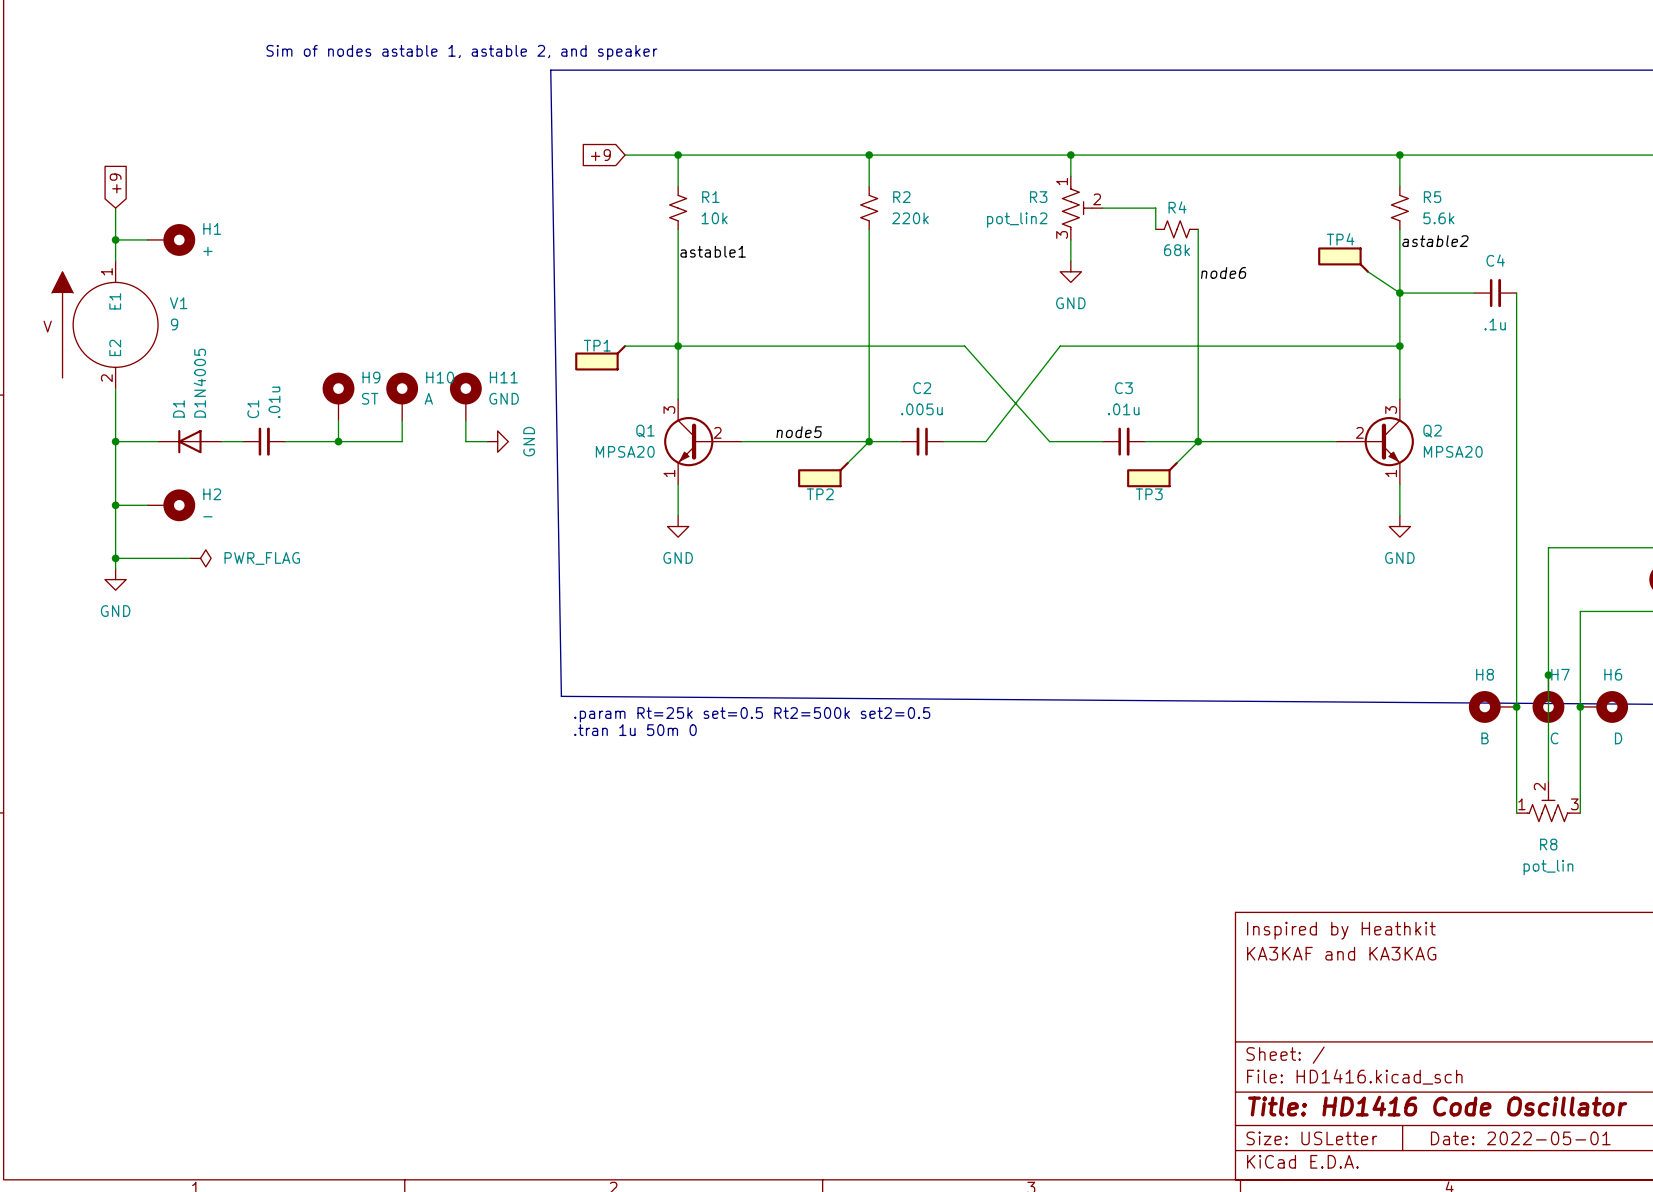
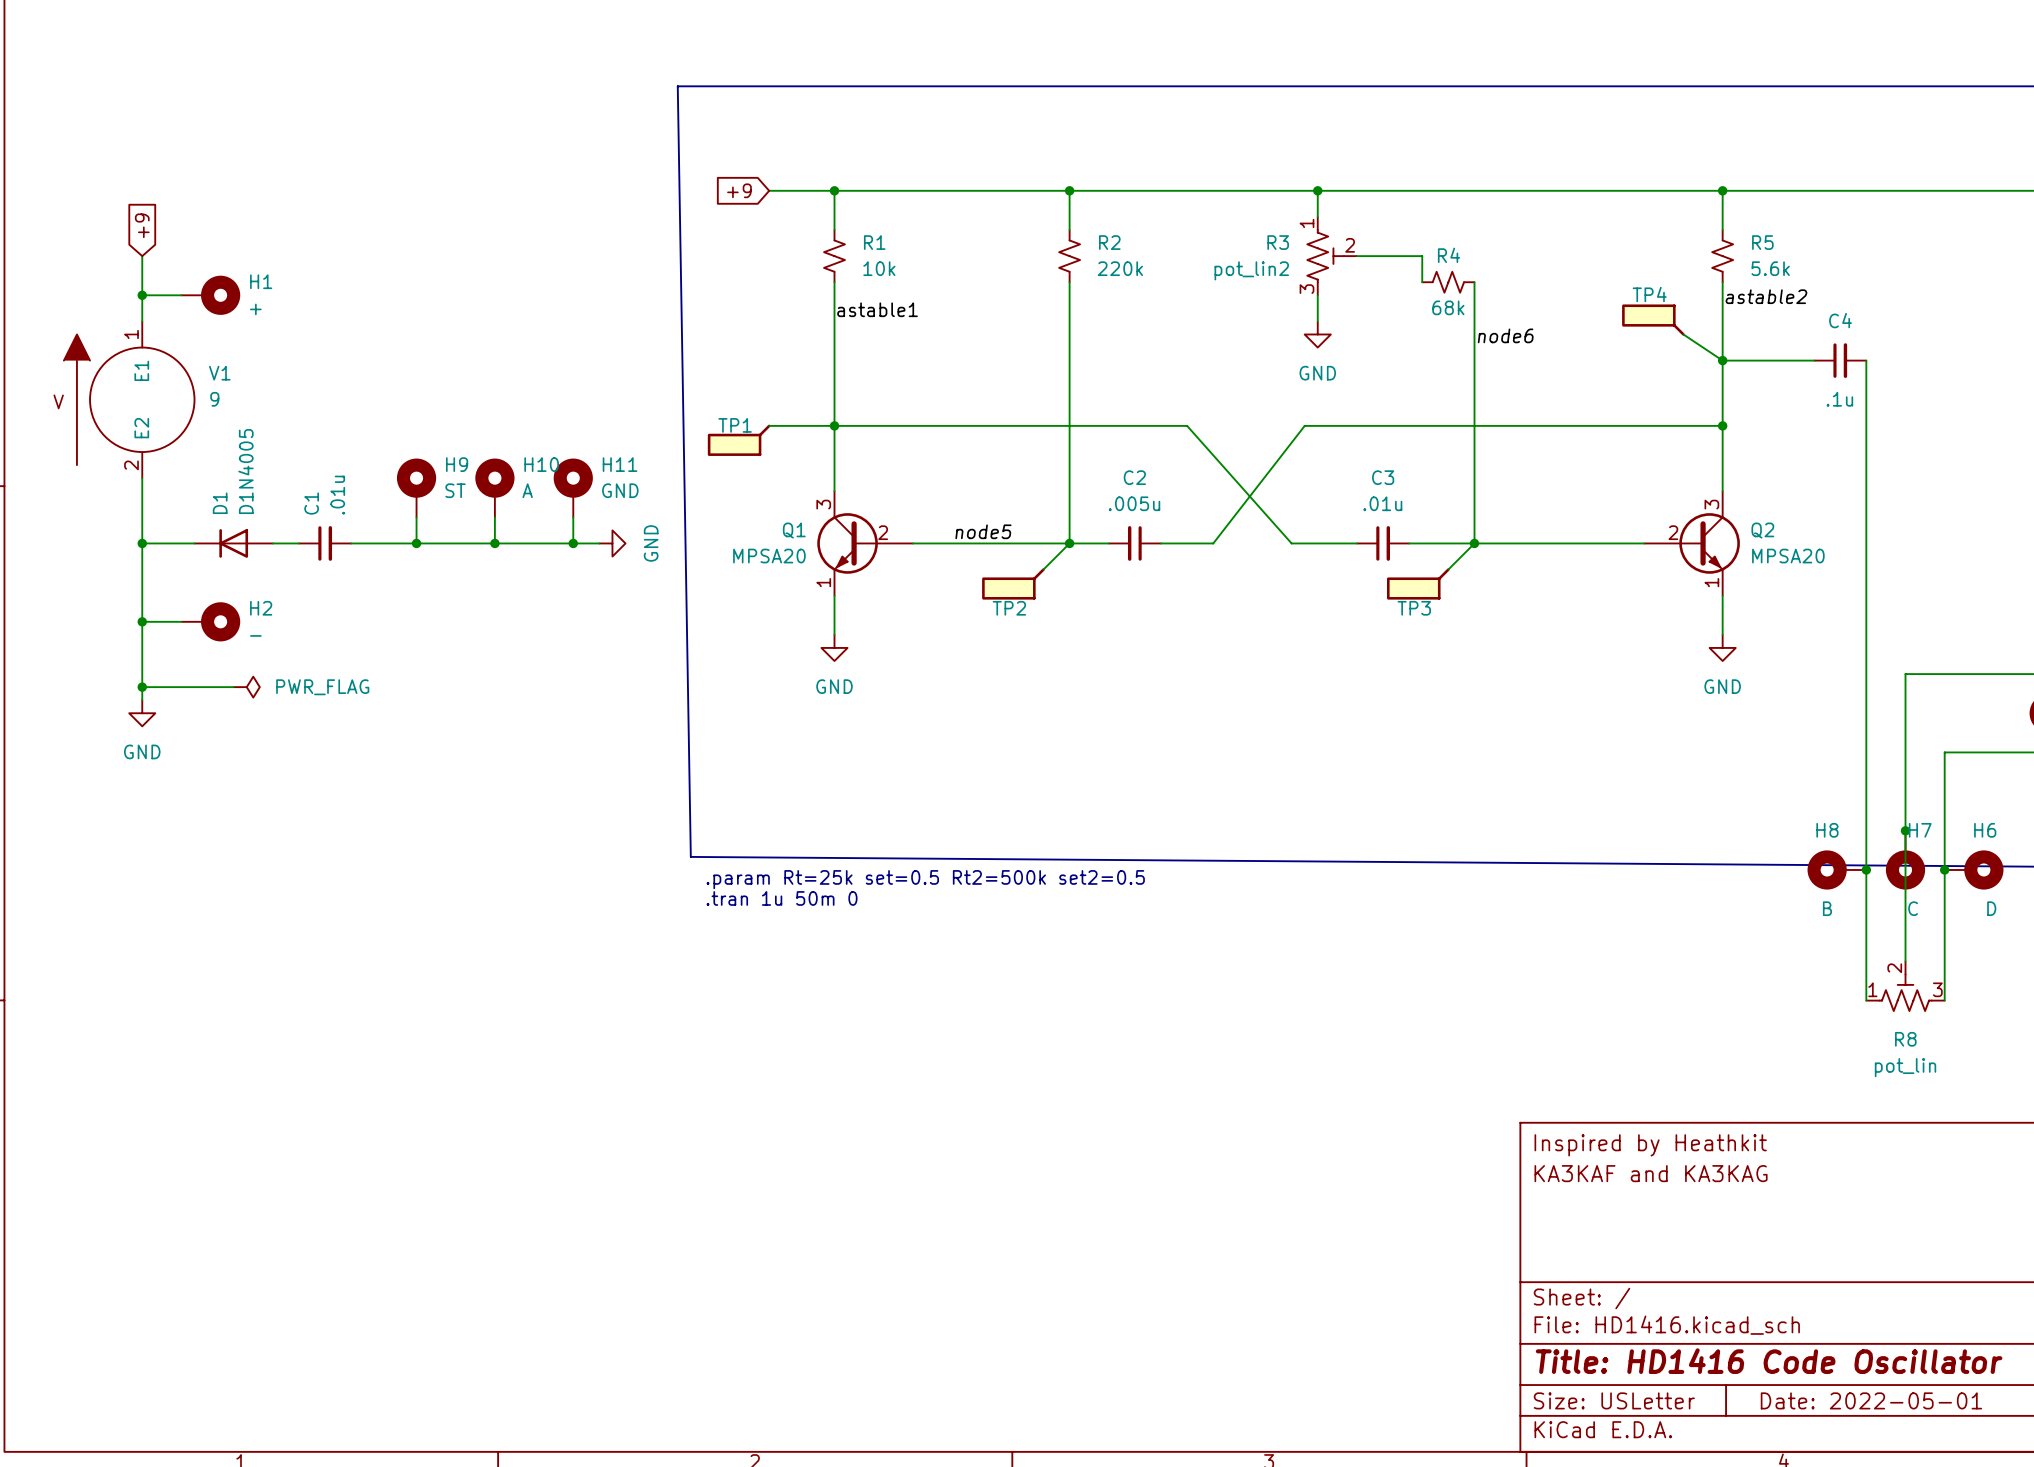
text: Sim of nodes astable 1, astable 2, and speaker (461, 52) -> none
wire: none -> (494, 543) (573, 543)
junction: none -> (494, 543)
junction: none -> (573, 543)

